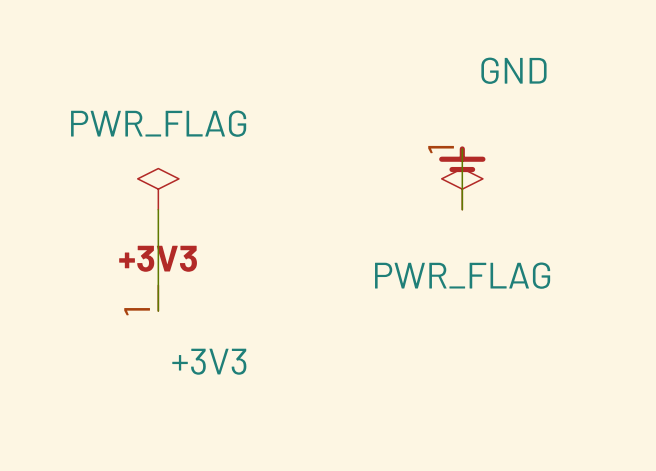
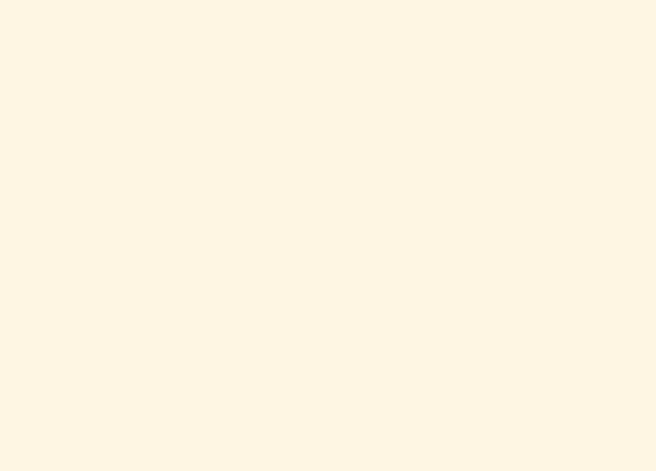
wire: (462, 148) (462, 209) -> none
power symbol: GND (462, 159) -> none
power symbol: PWR_FLAG (158, 189) -> none
power symbol: PWR_FLAG (462, 189) -> none
wire: (158, 209) (158, 311) -> none
power symbol: +3V3 (158, 298) -> none

